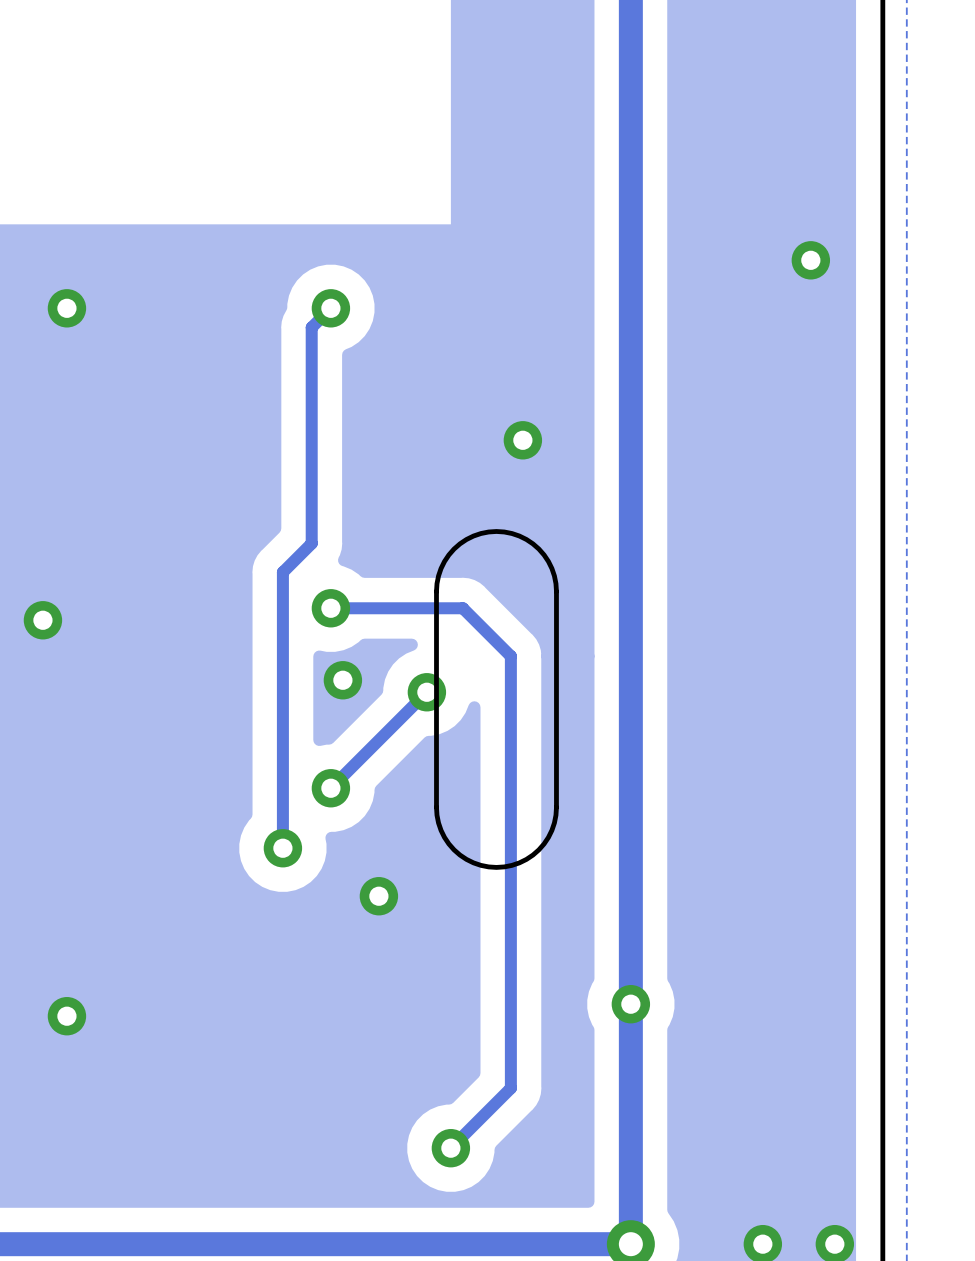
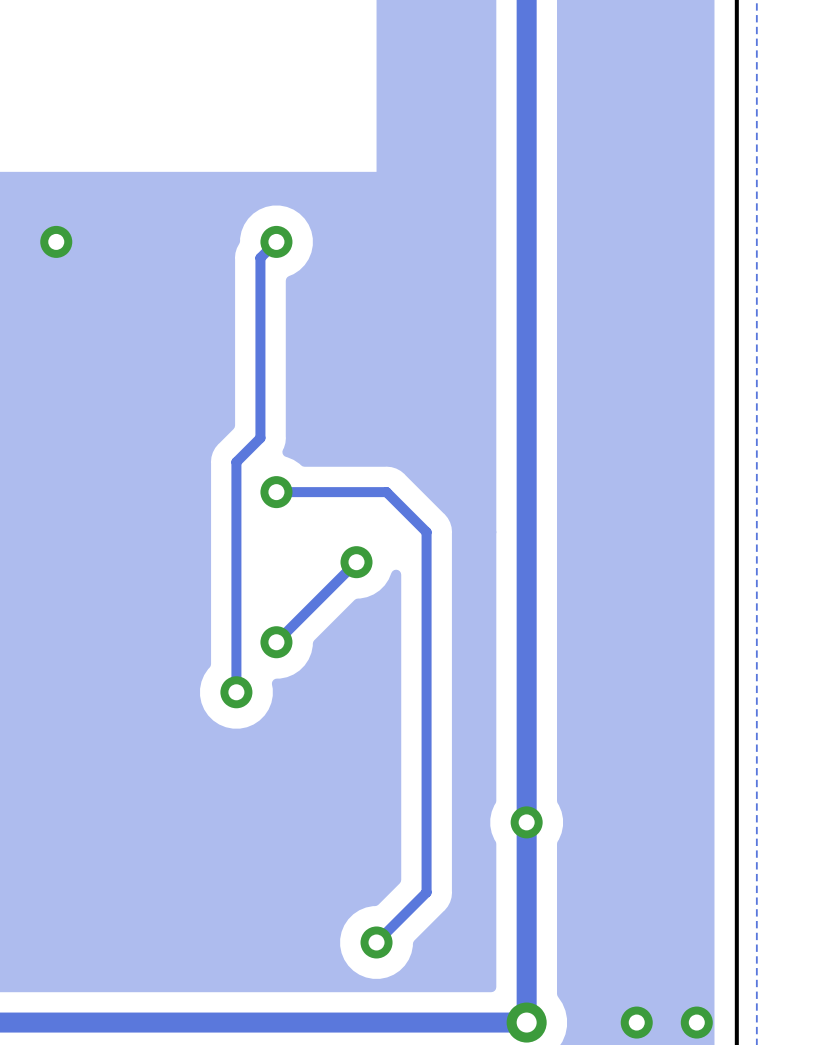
via: (810, 260) -> none
via: (522, 440) -> none
board edge: (556, 591) (556, 807) (554, 822) (544, 843) (526, 859) (504, 866) (480, 865) (466, 859) (454, 849) (441, 830) (437, 815) (436, 591) (438, 575) (448, 554) (466, 539) (488, 531) (504, 531) (526, 539) (538, 549) (551, 568) (556, 591) -> none
via: (42, 620) -> none
via: (342, 680) -> none
via: (378, 896) -> none
via: (66, 1016) -> none

